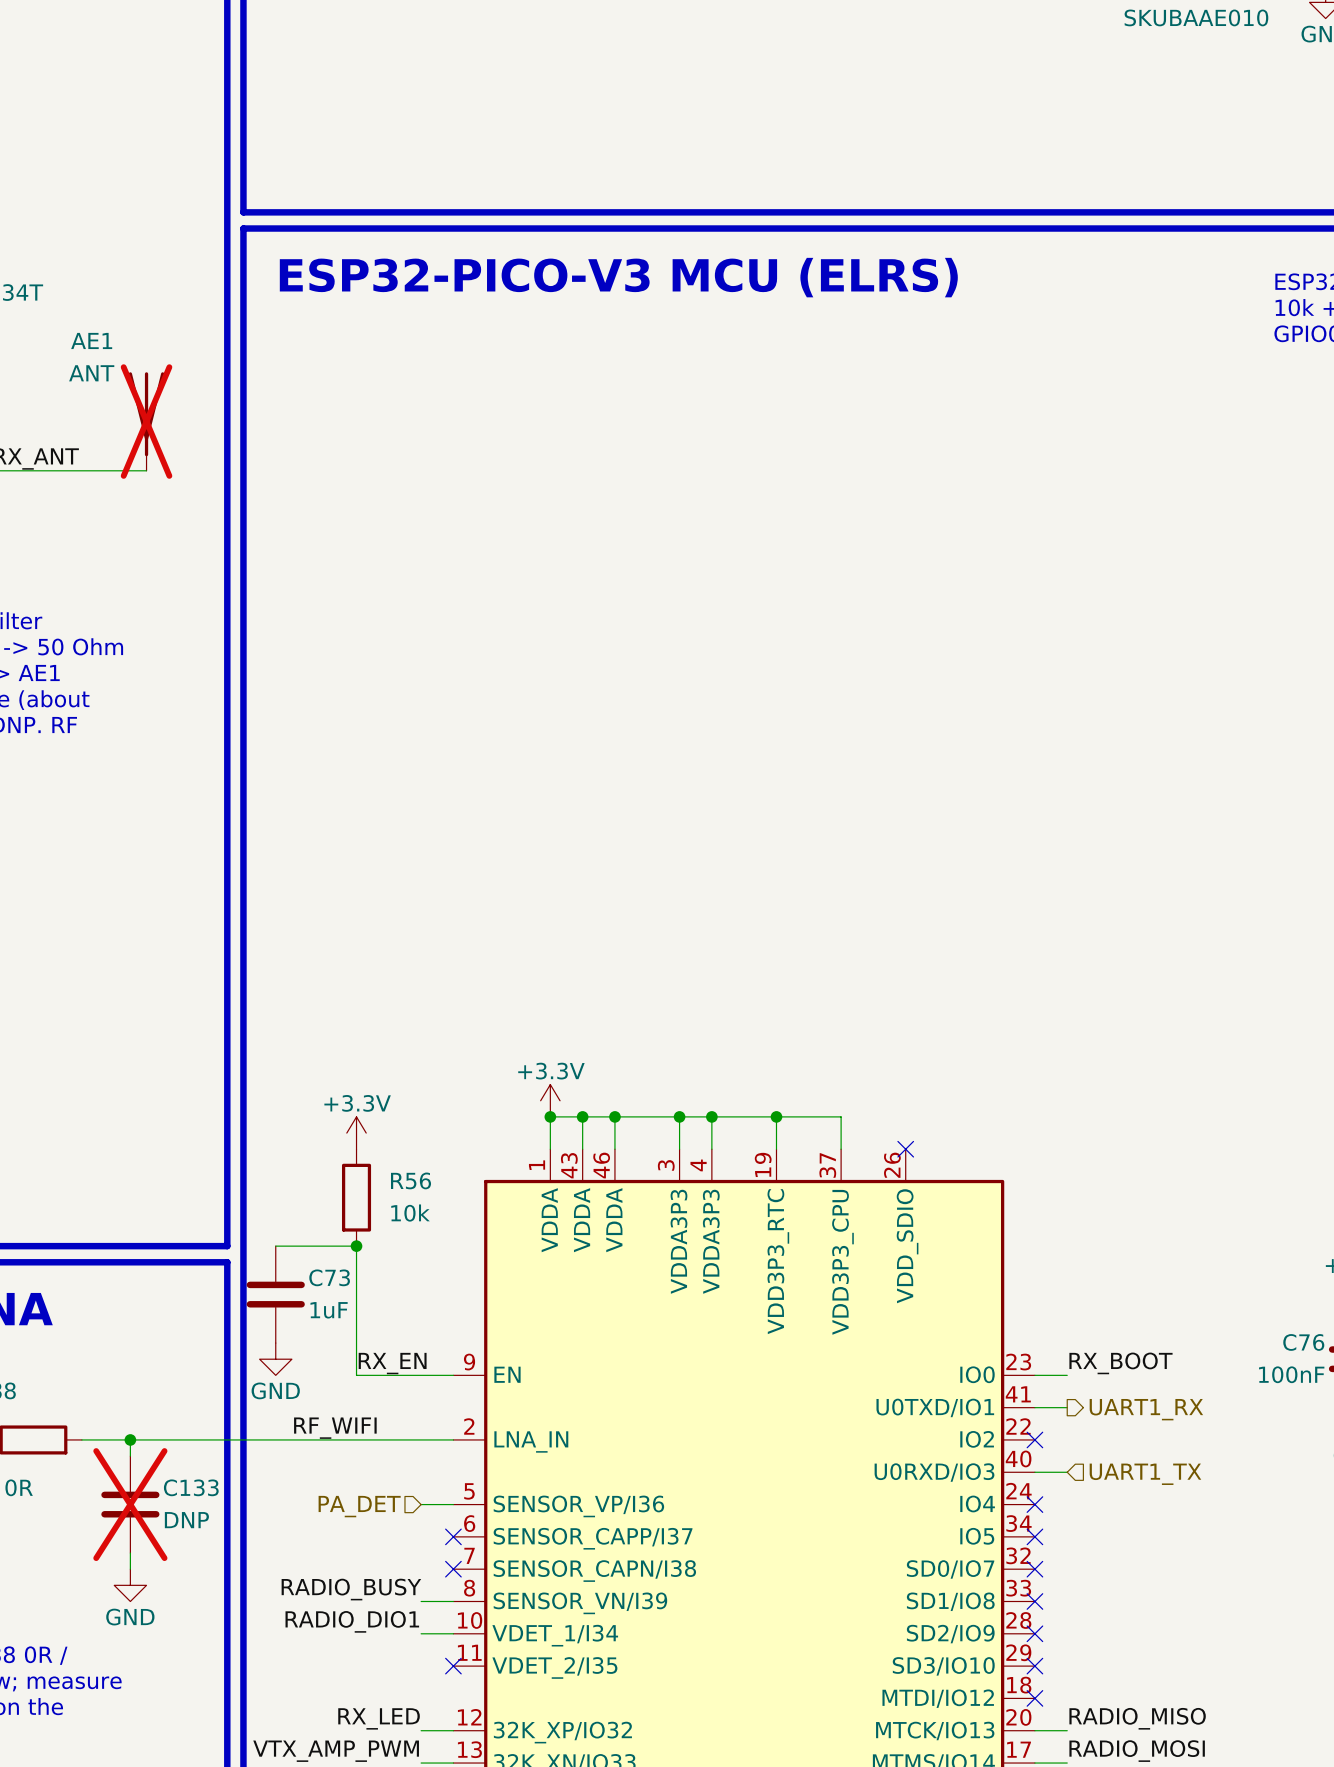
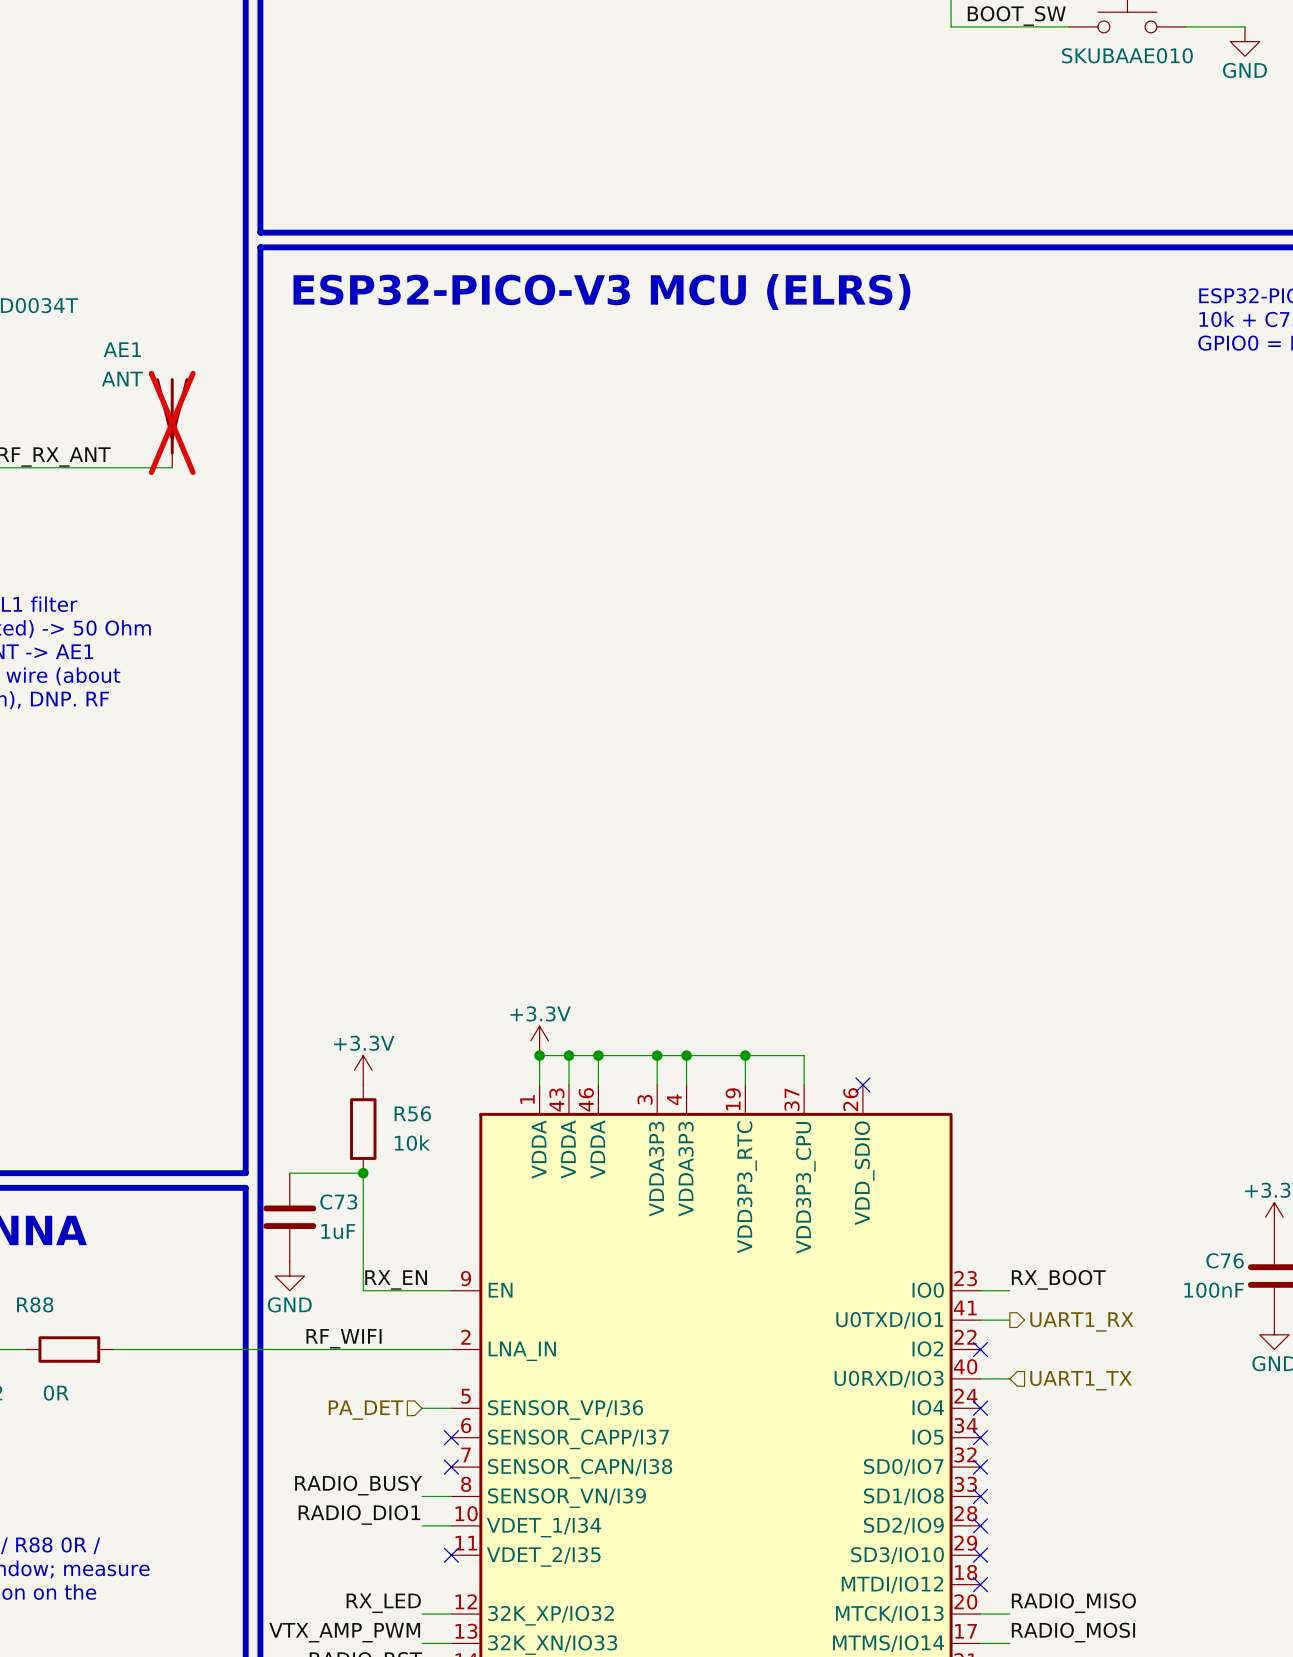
wire: (130, 1439) (130, 1456) -> none
junction: (130, 1439) -> none
C133: DNP (130, 1504) -> none
wire: (130, 1553) (130, 1569) -> none
power symbol: GND (130, 1585) -> none

